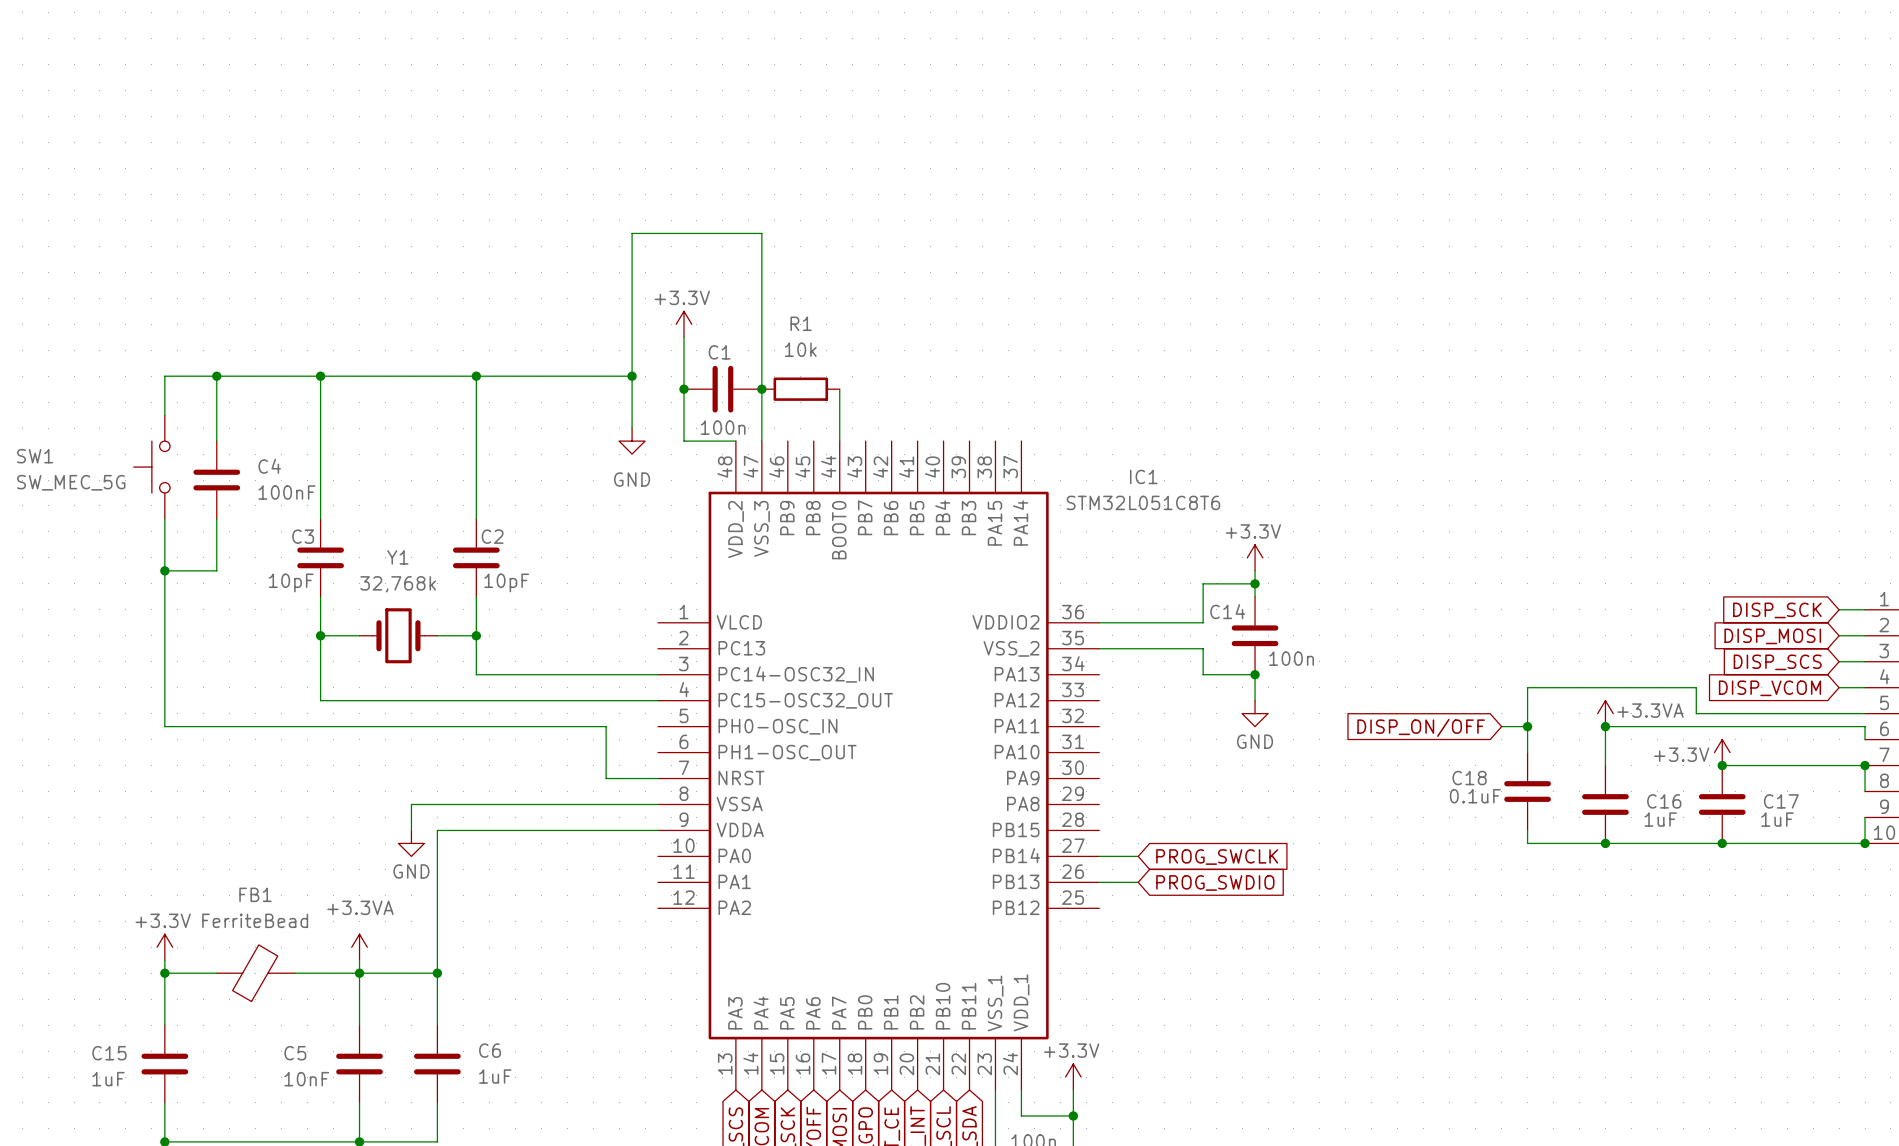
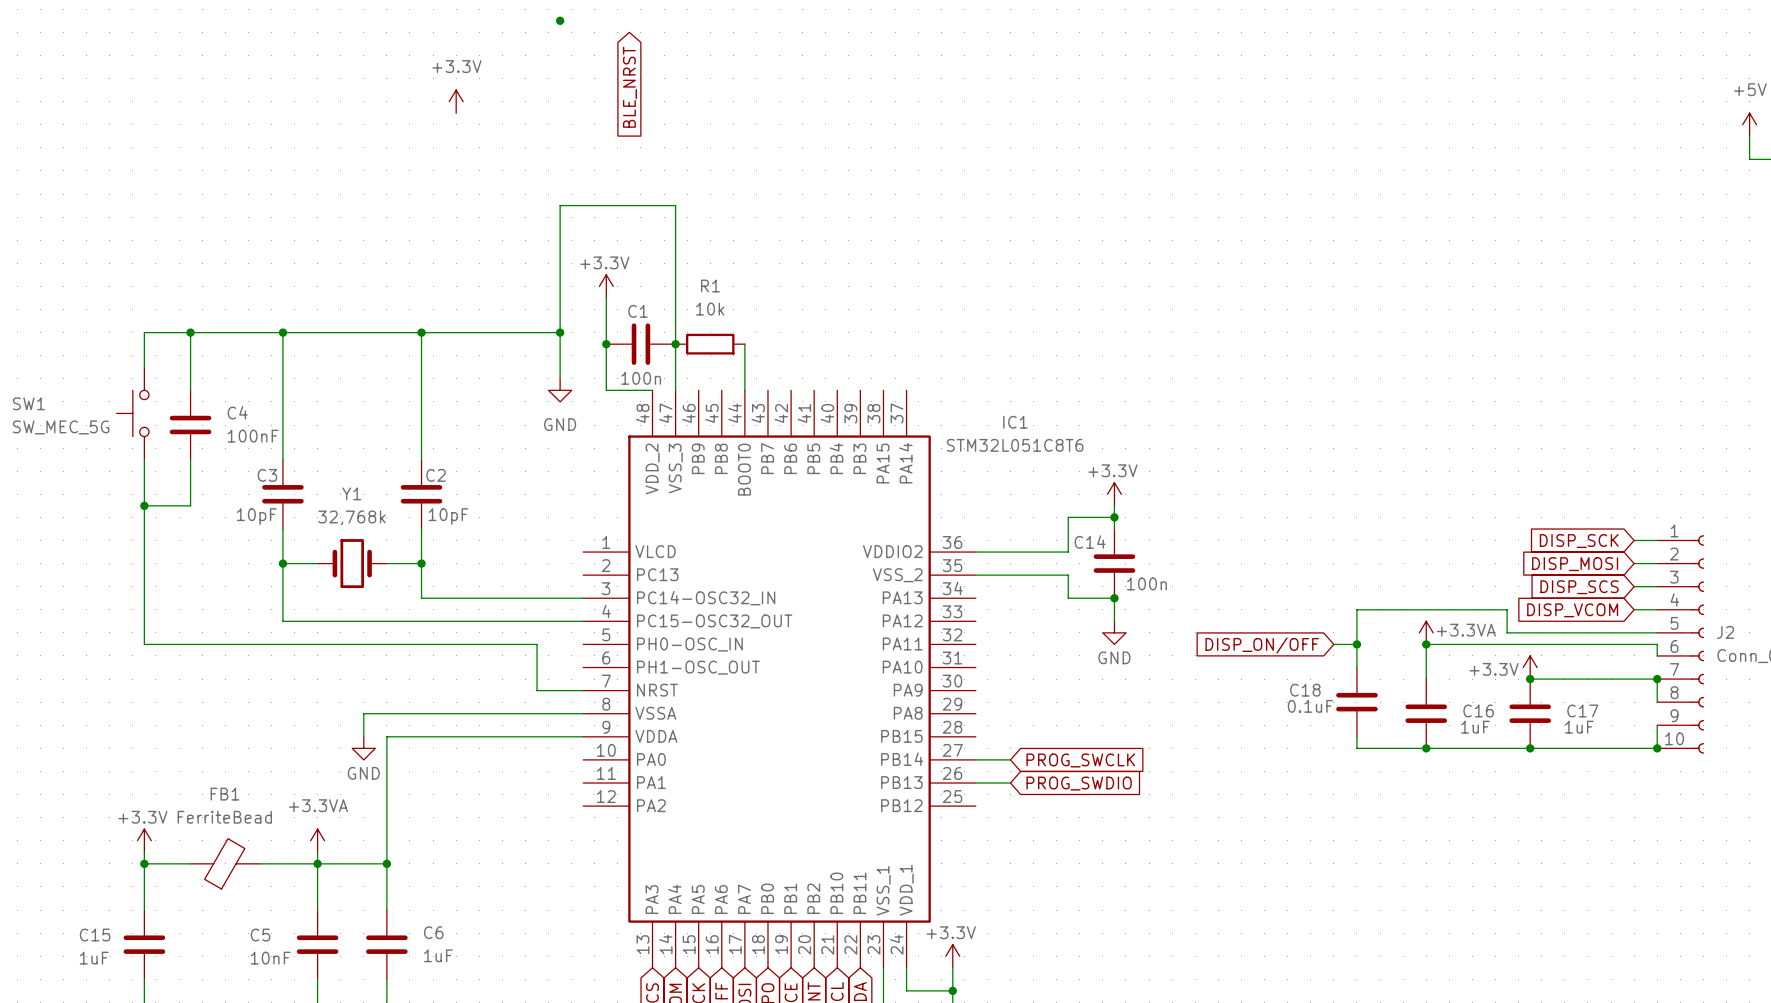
junction: none -> (560, 20)
global label: none -> BLE_NRST (629, 87)
power symbol: none -> +3.3V (456, 101)

